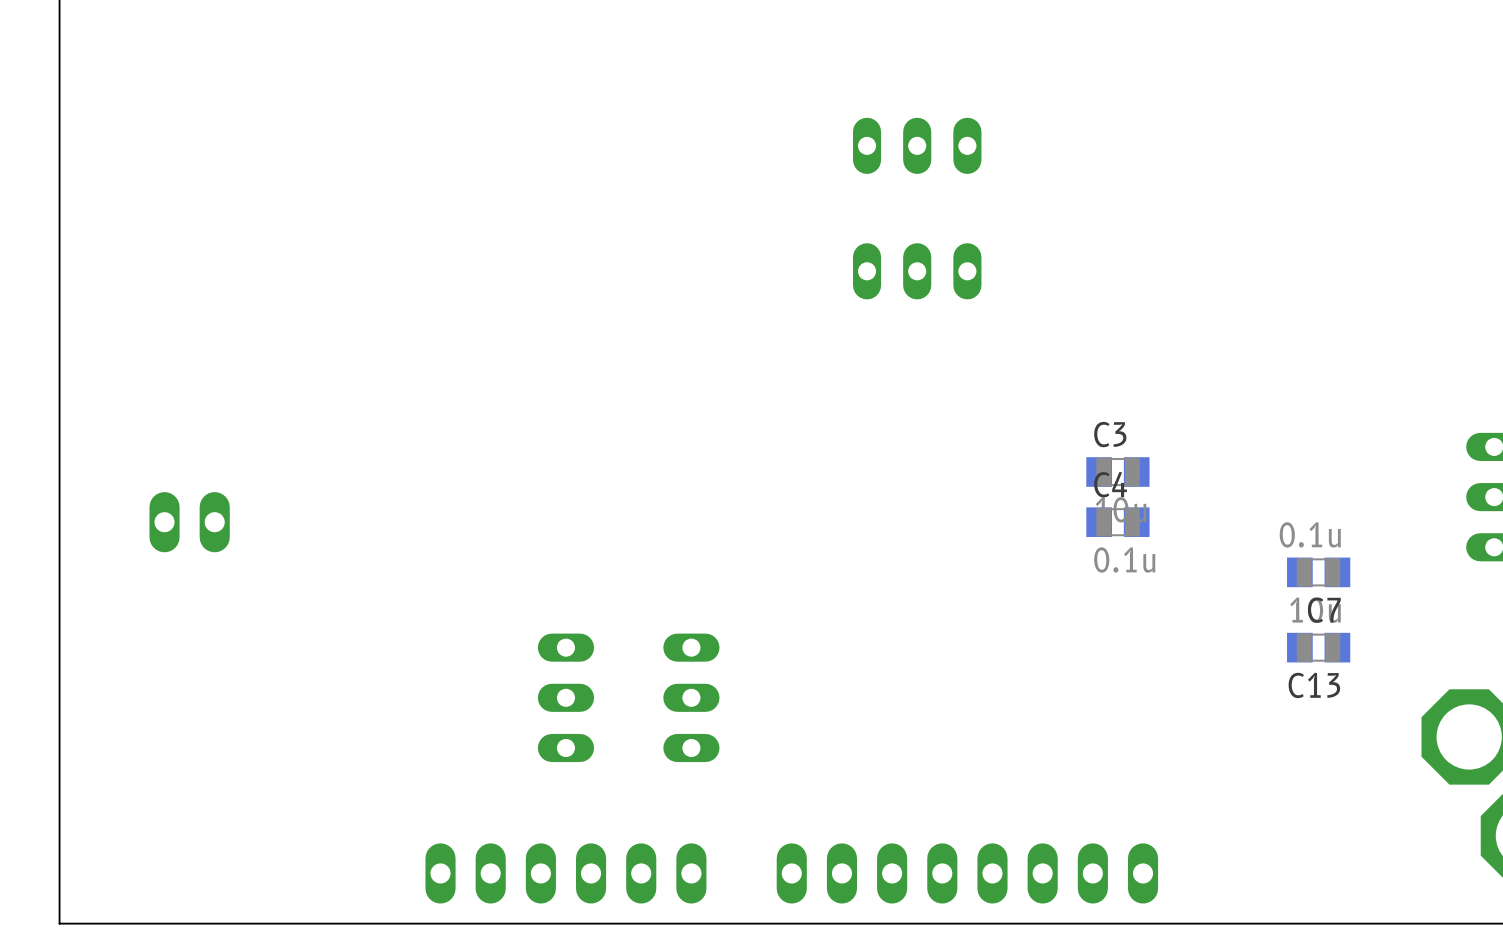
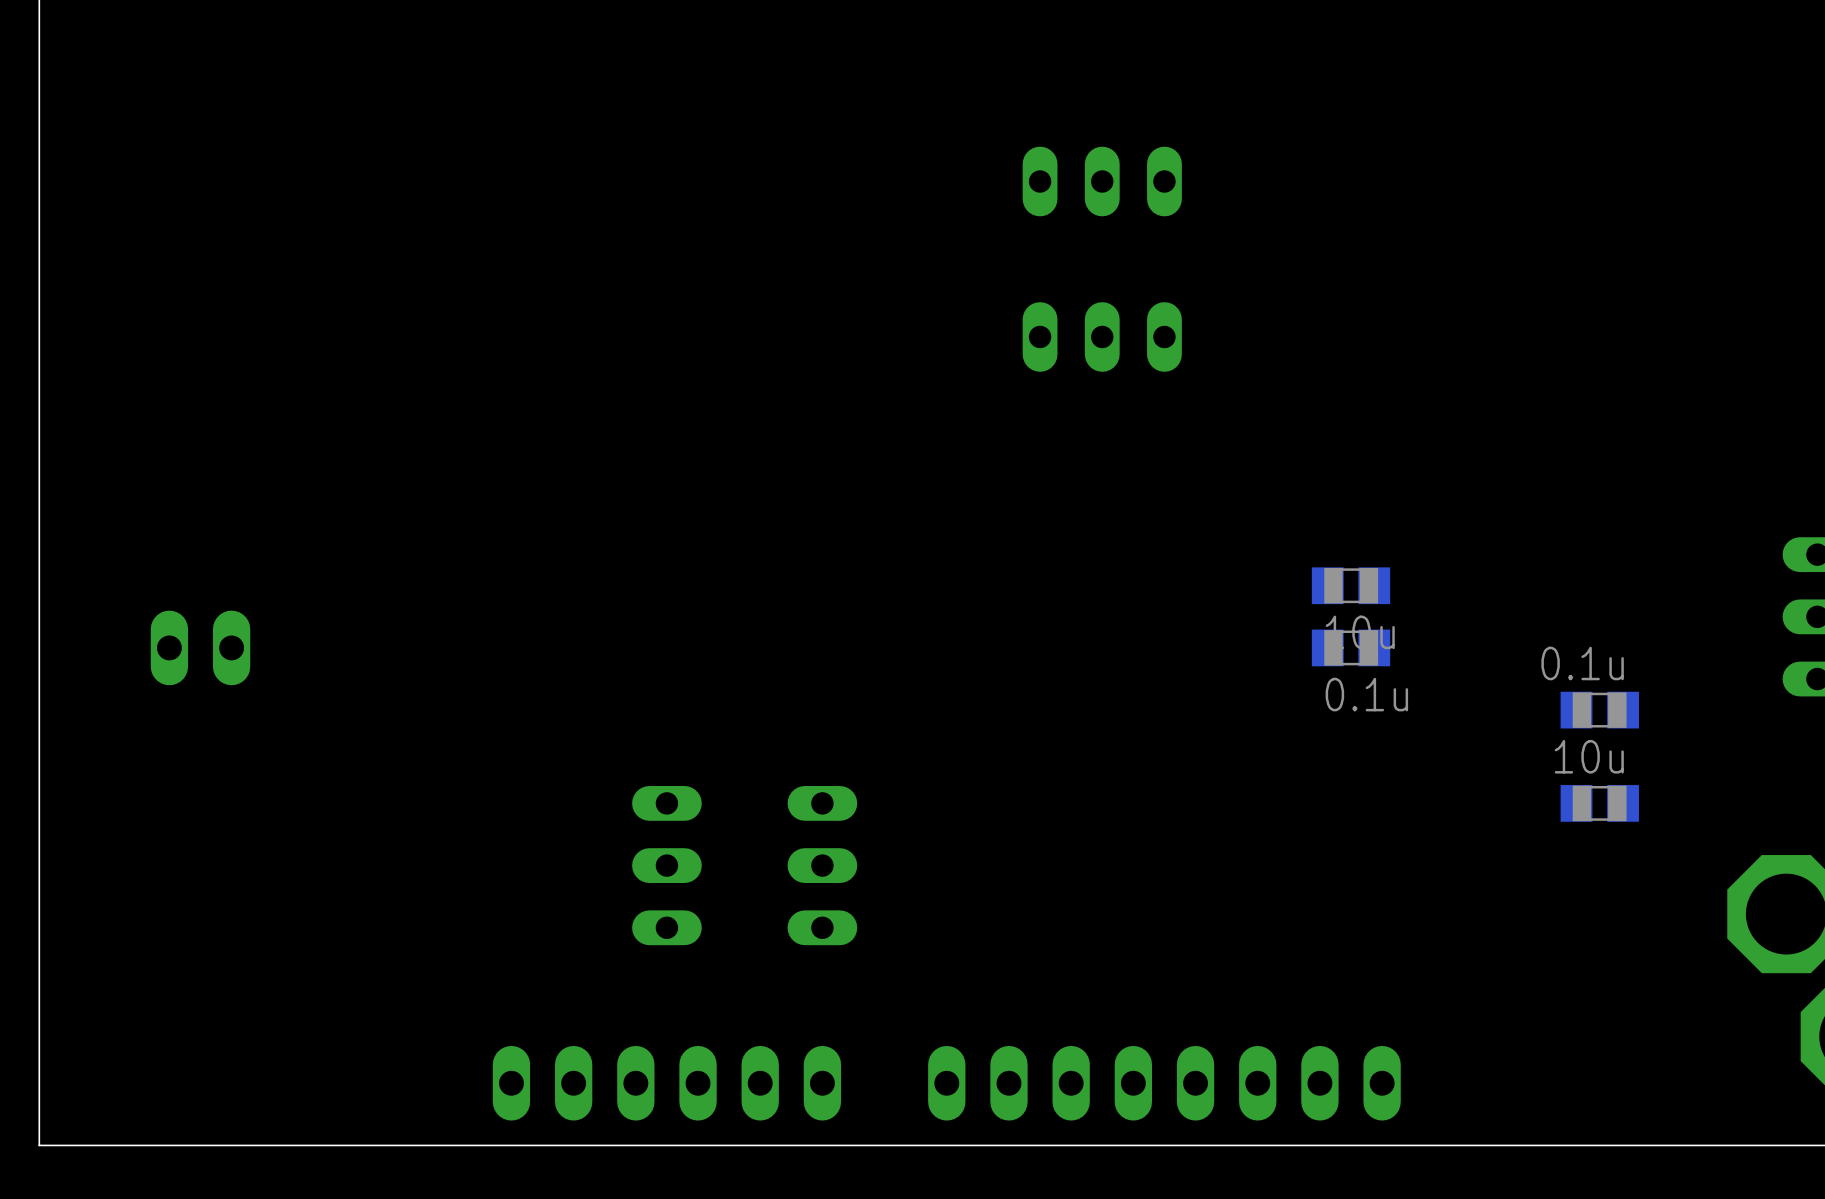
C3 name: C3 (1110, 434) -> none
C4 name: C4 (1110, 484) -> none
C7 name: C7 (1324, 610) -> none
C13 name: C13 (1314, 685) -> none

